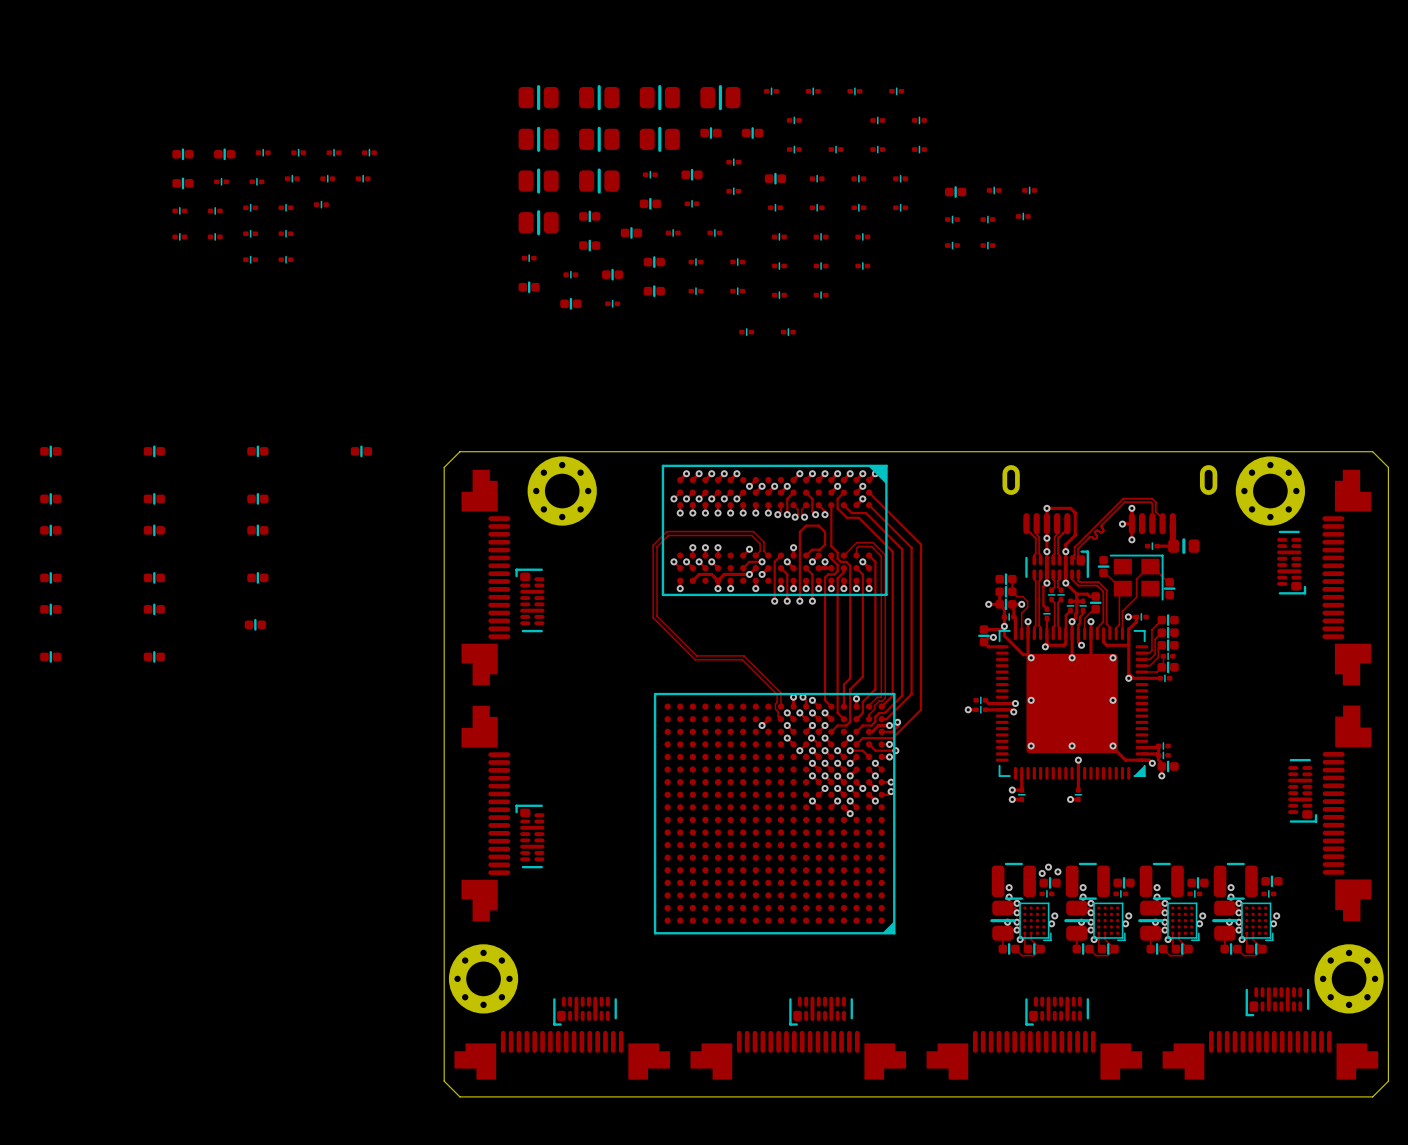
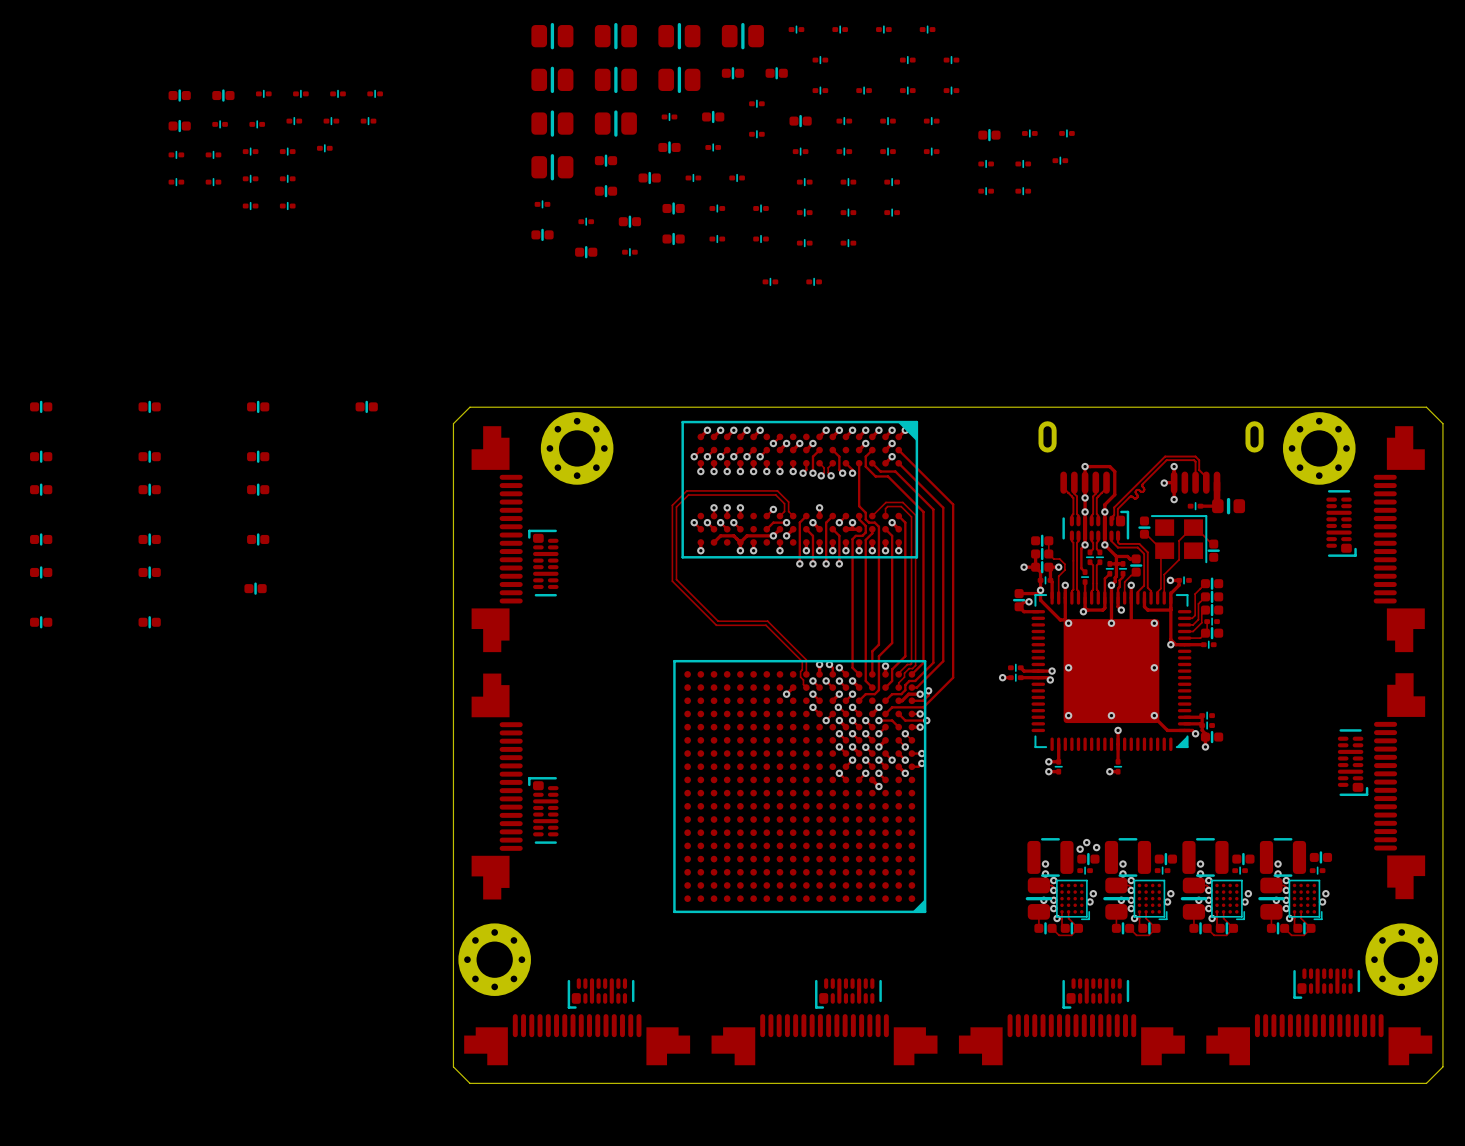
track: (806, 555) (811, 549) (819, 549) (825, 544) (825, 531) (818, 525) (806, 525) (799, 531) (799, 561) -> (832, 516) (826, 522)

